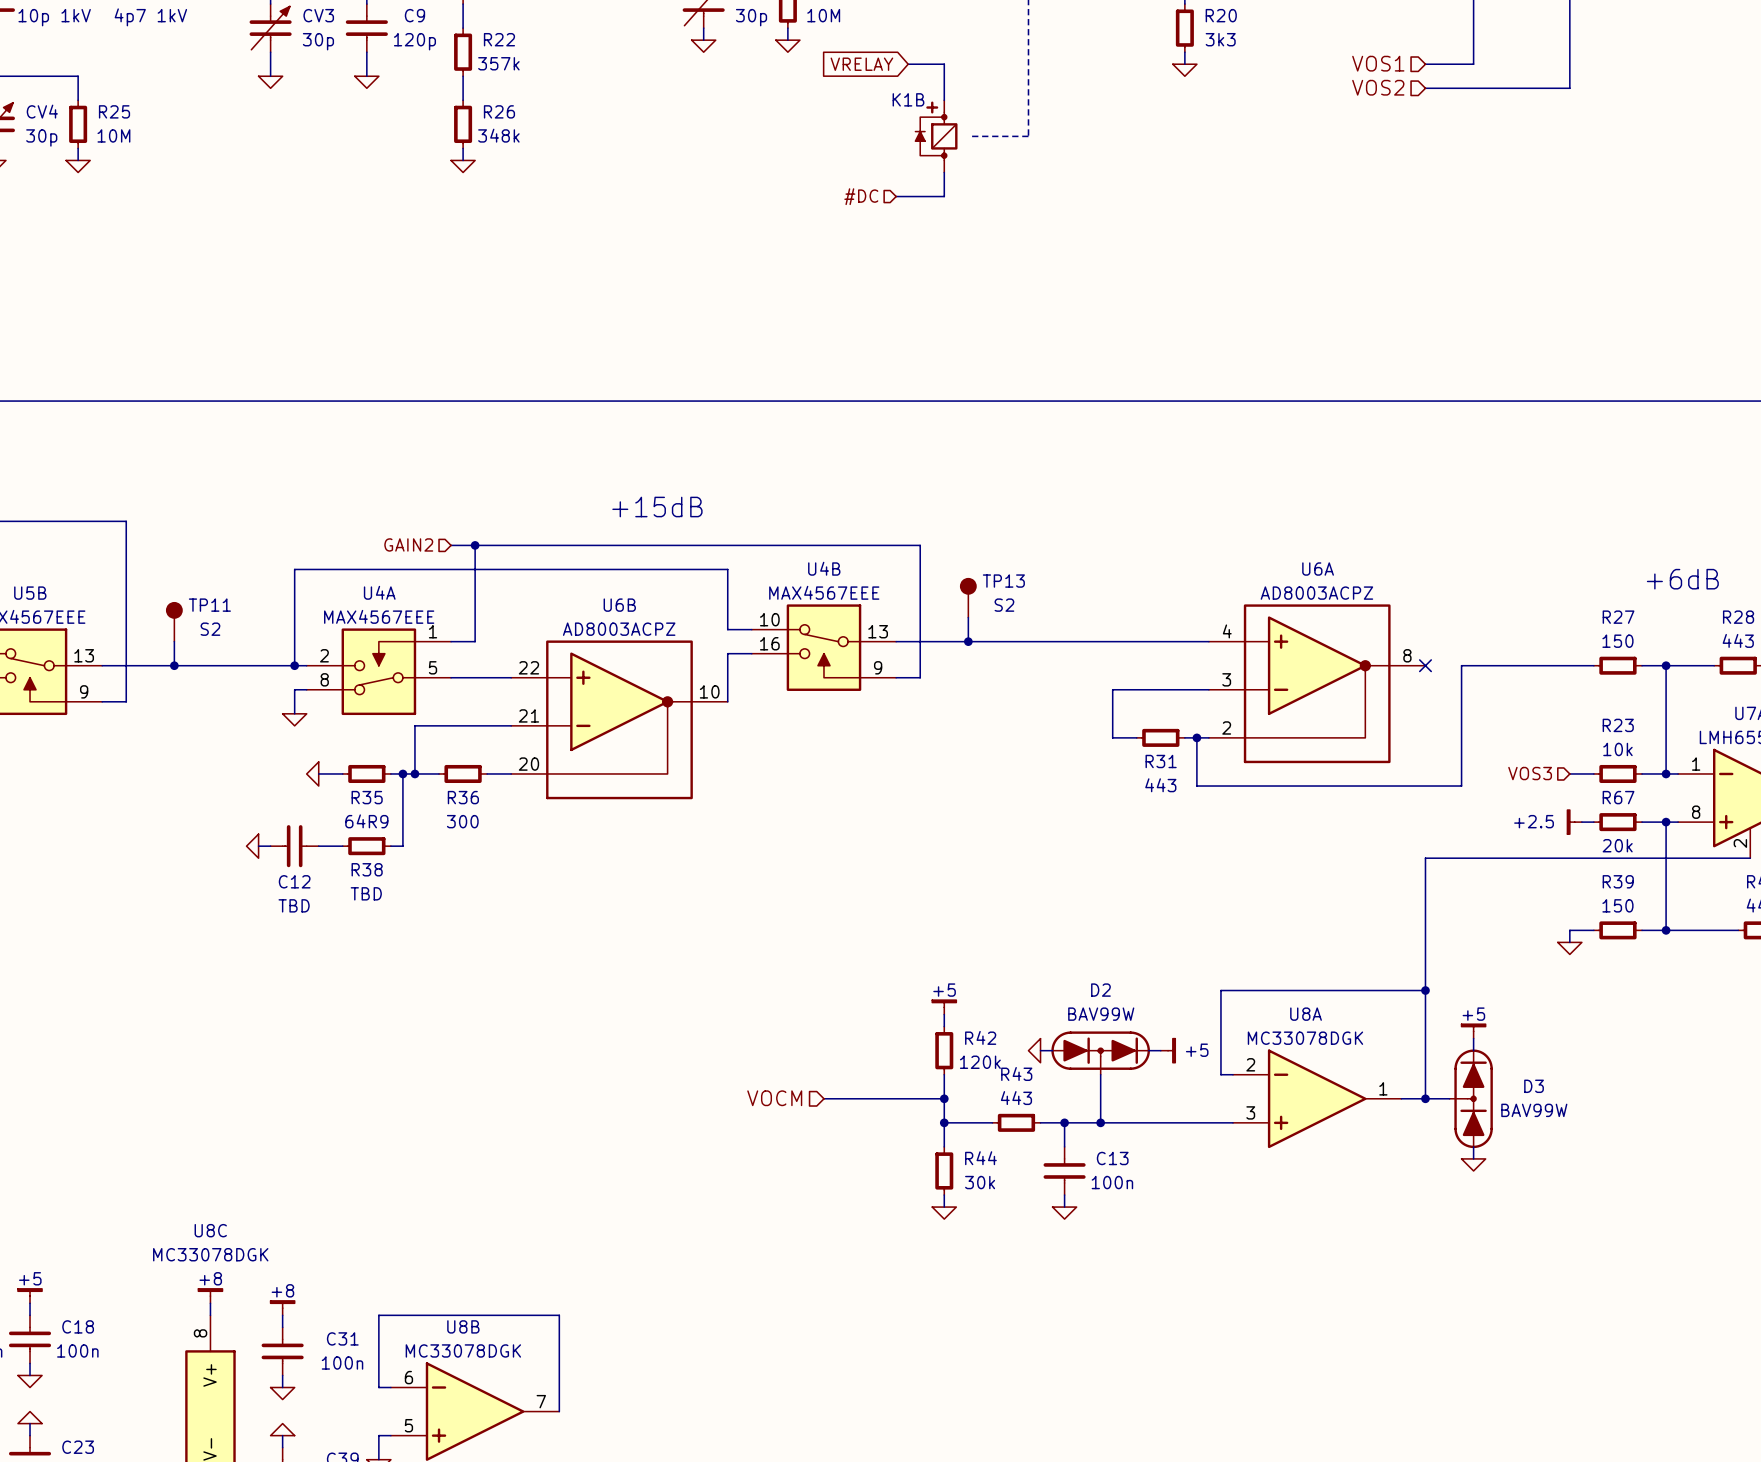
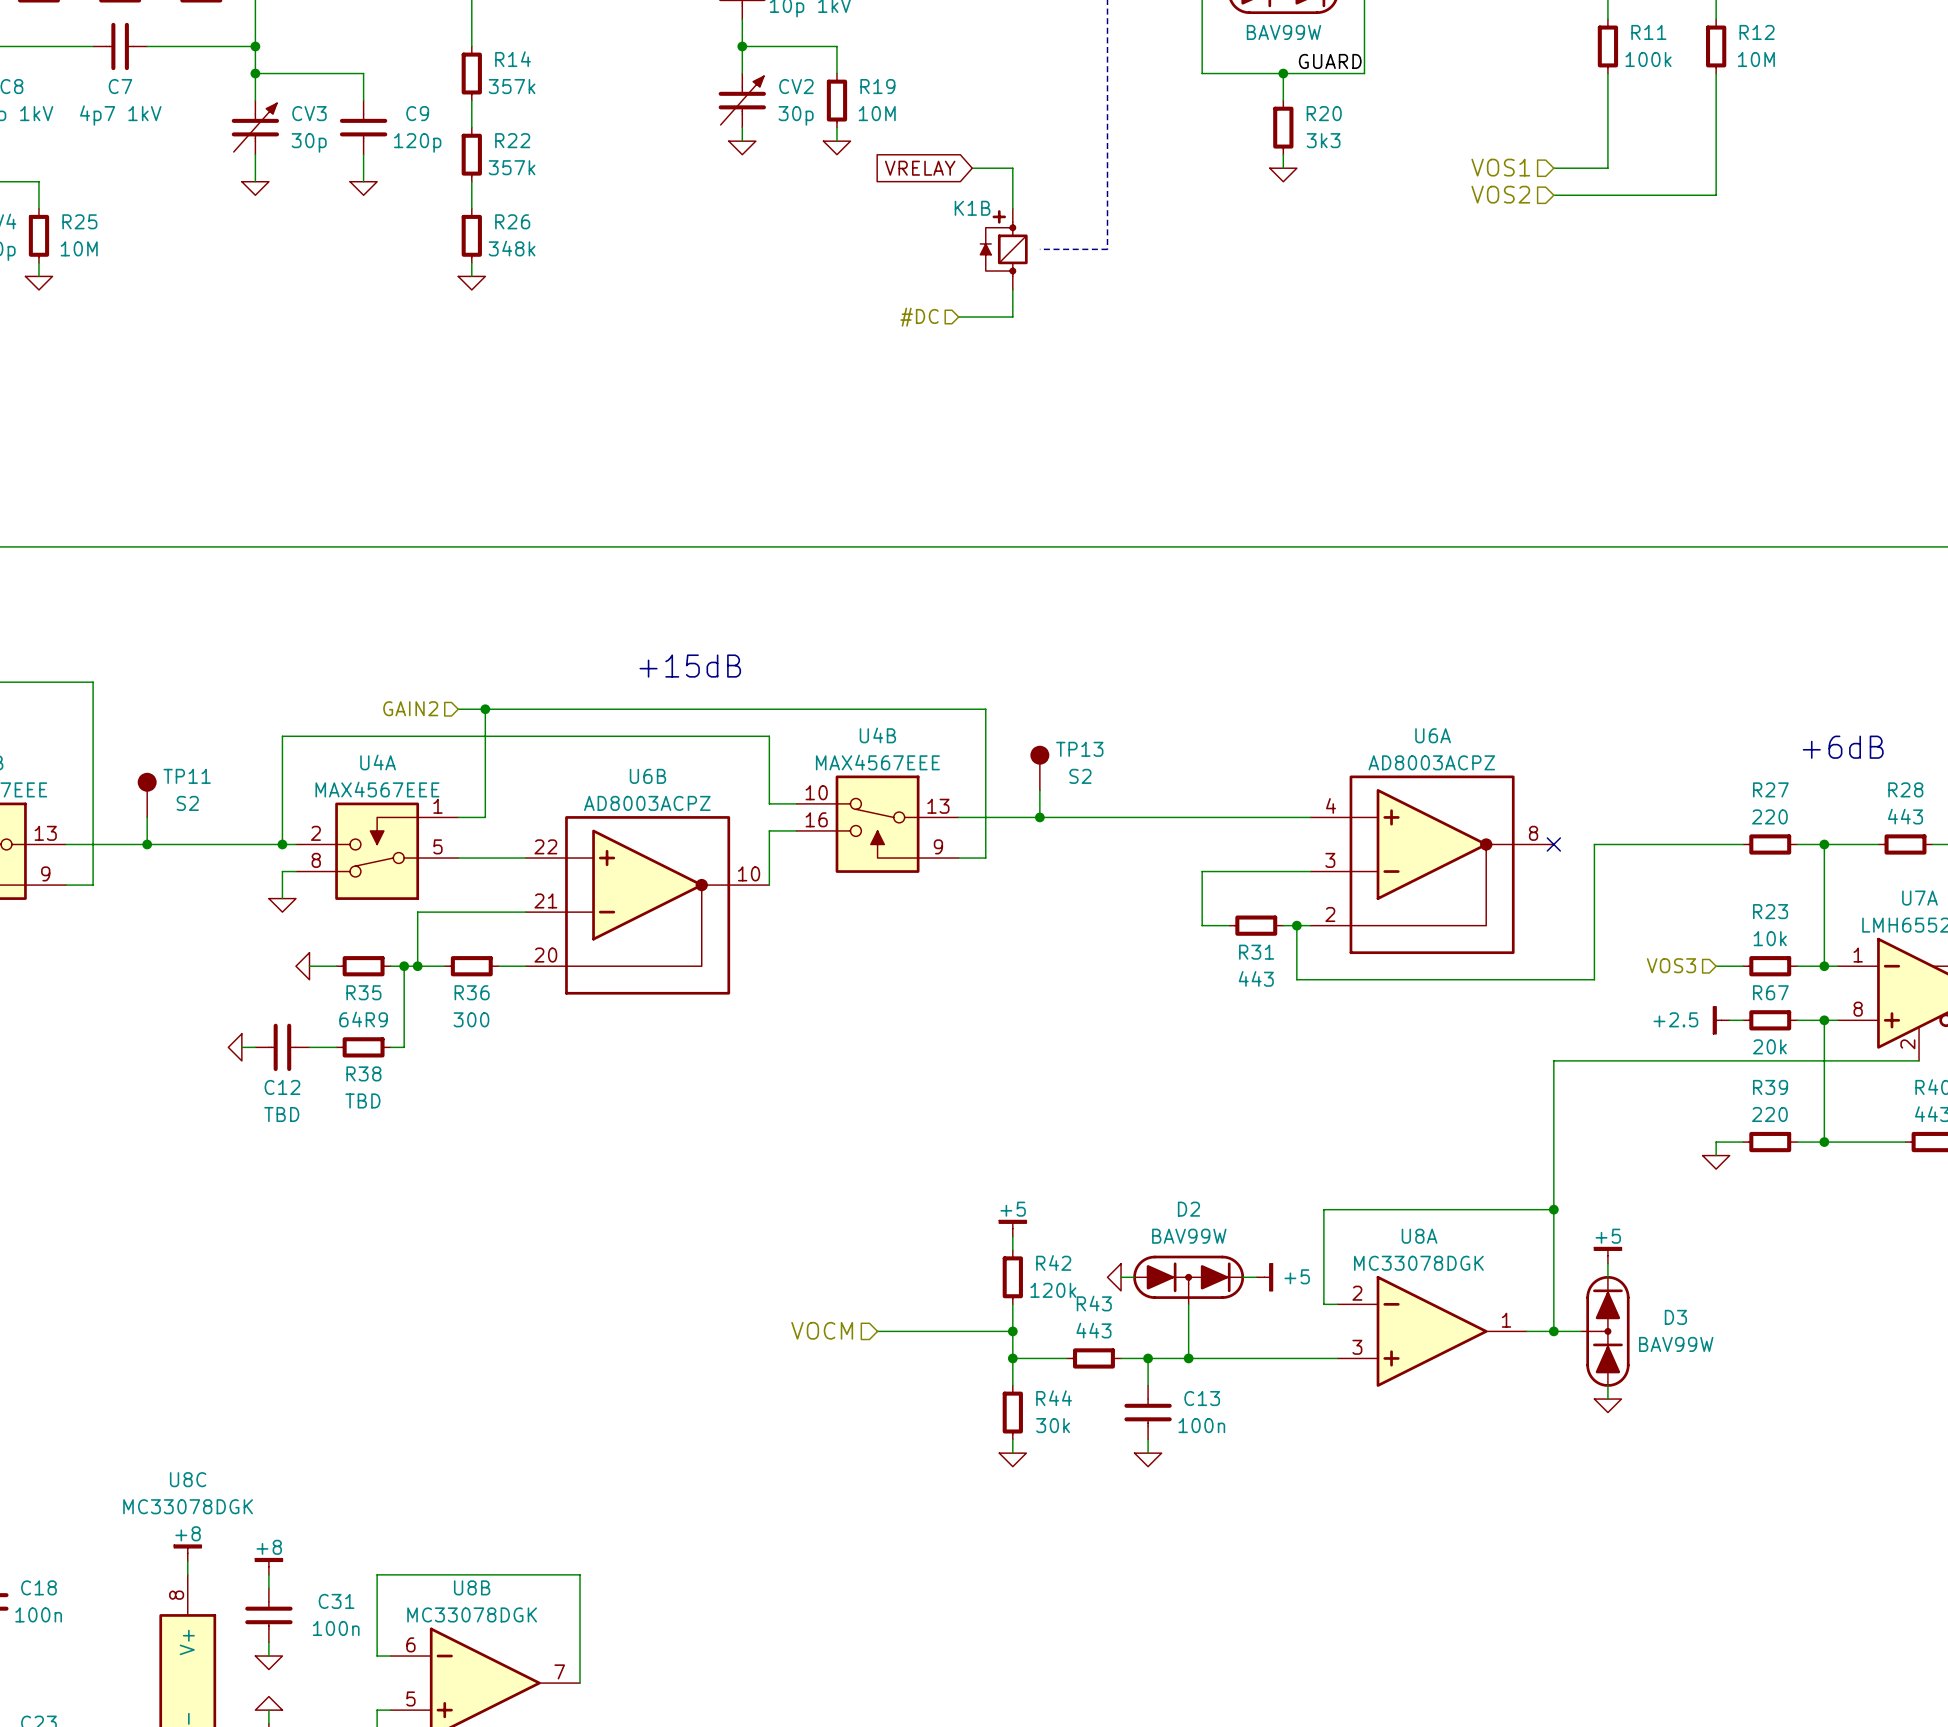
R27 value: 150 (1617, 641) -> 220 (1769, 816)
R39 value: 150 (1617, 905) -> 220 (1769, 1114)

